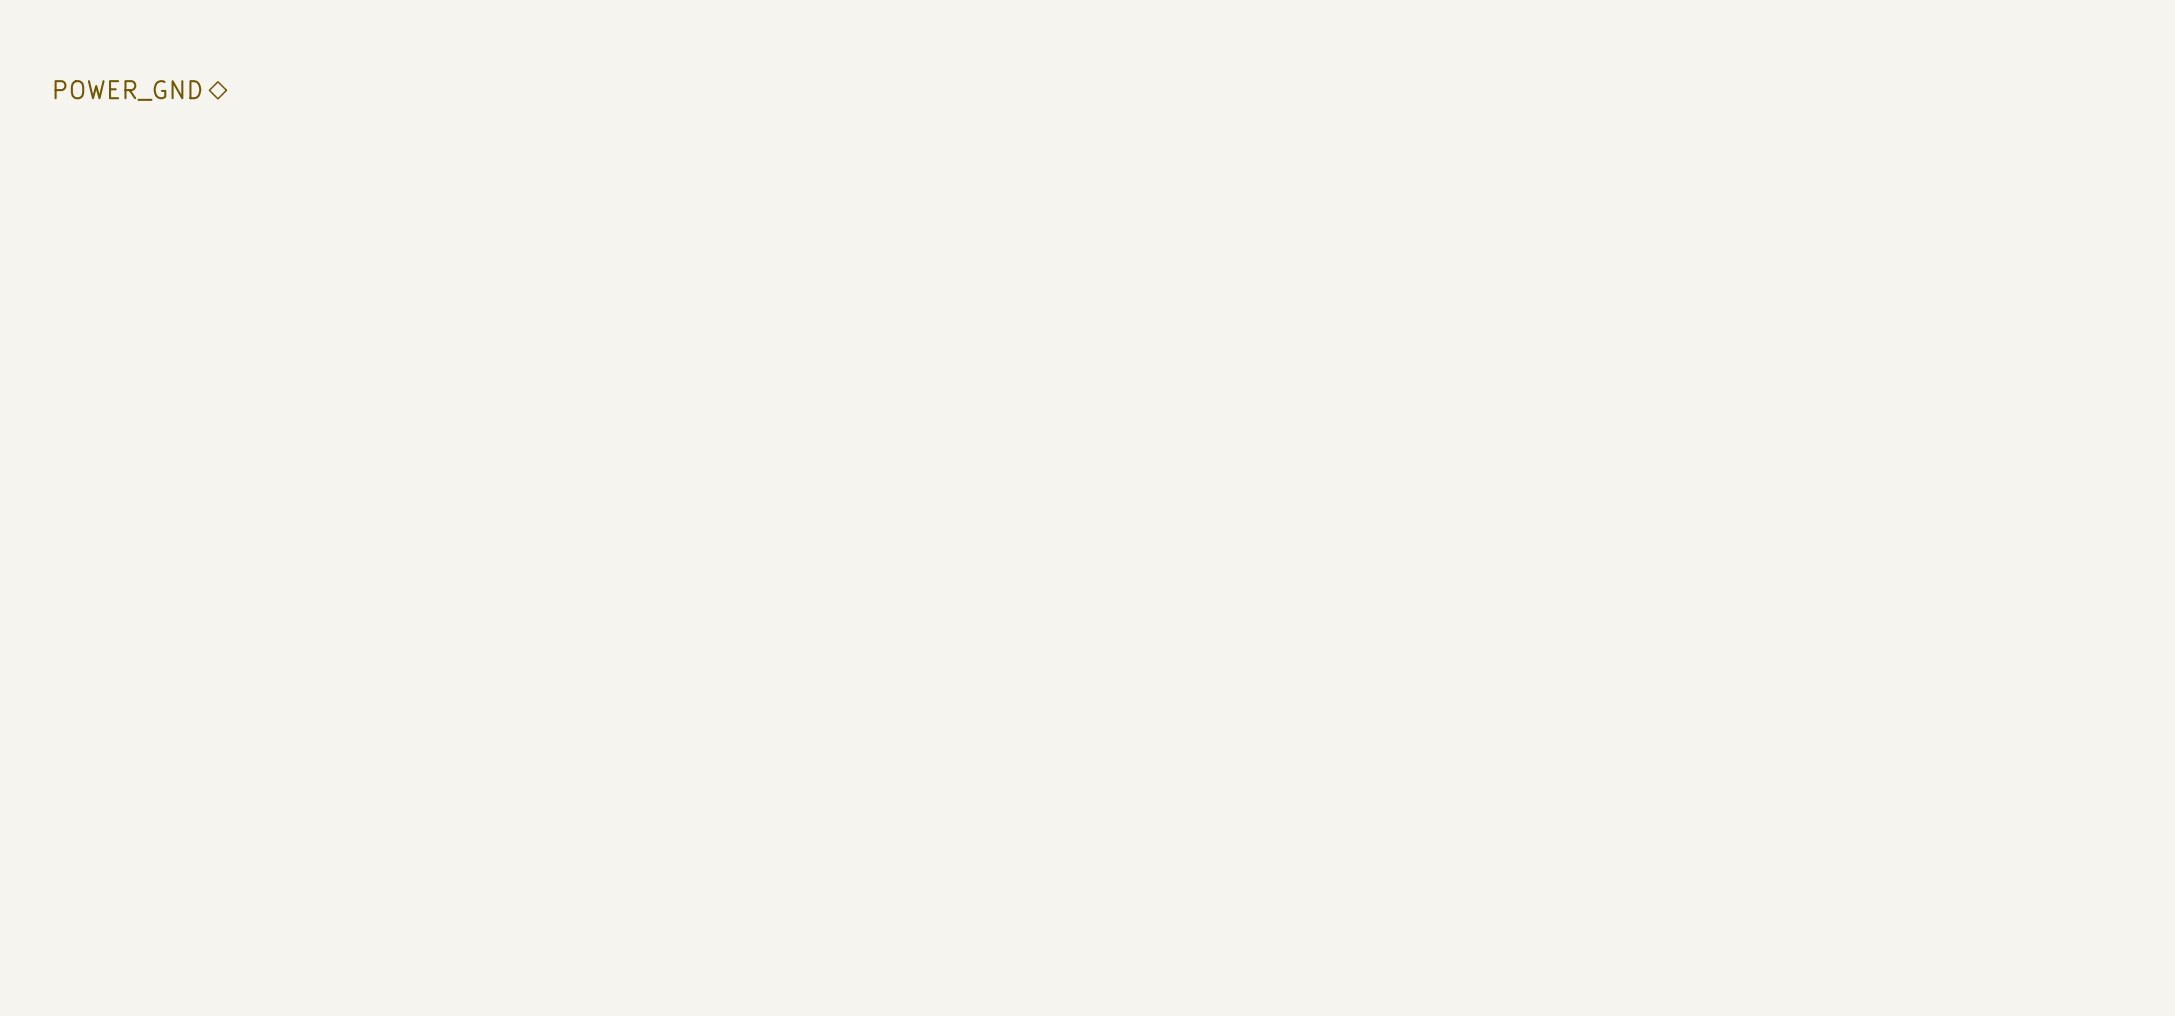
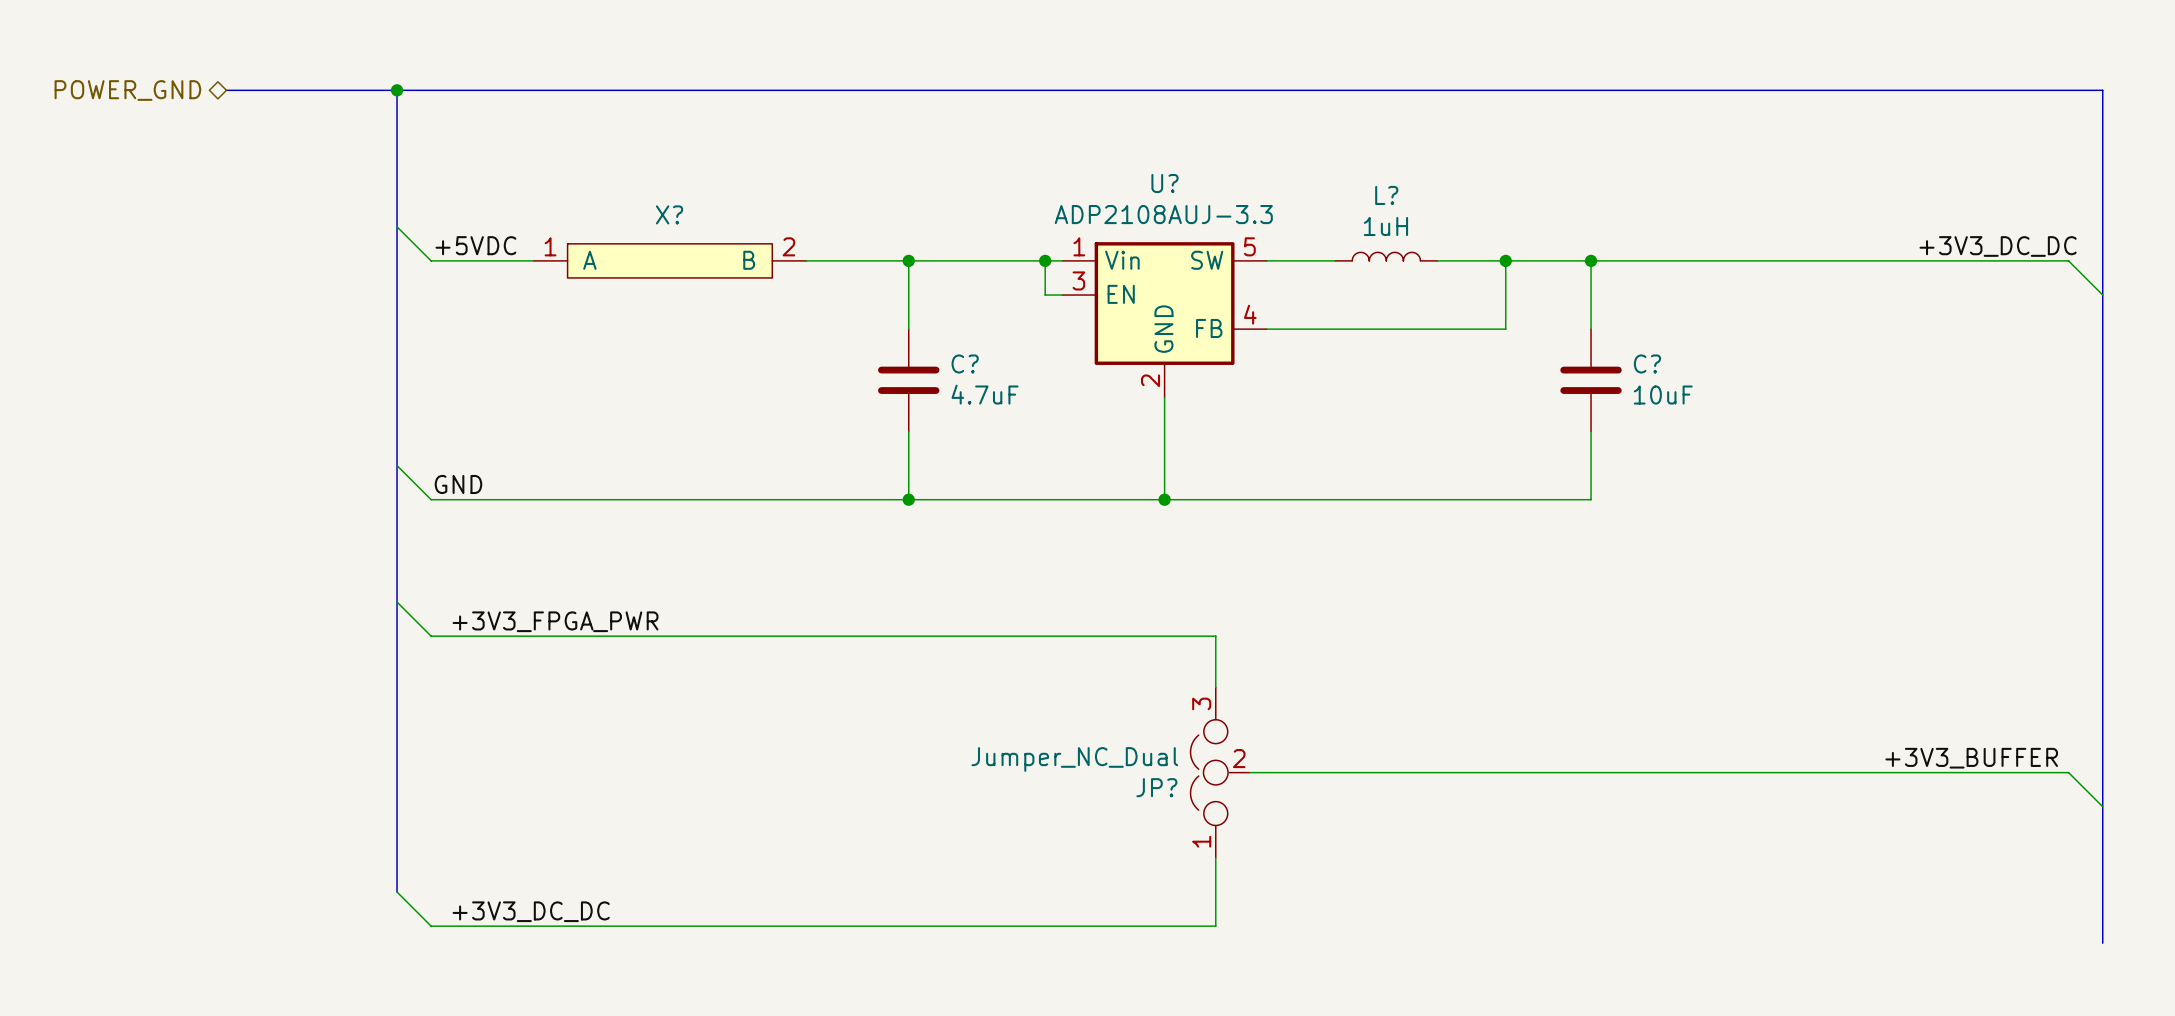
bus: none -> (226, 90) (2102, 90) (2102, 943)
bus: none -> (397, 90) (397, 892)
junction: none -> (397, 90)
wire: none -> (397, 226) (431, 260) (533, 260)
label: none -> +5VDC (475, 245)
label: none -> +3V3_DC_DC (1998, 246)
L?: none -> 1uH (1386, 256)
X?: none -> (669, 260)
wire: none -> (806, 260) (1062, 260)
wire: none -> (908, 260) (908, 329)
junction: none -> (908, 260)
wire: none -> (1045, 260) (1045, 295) (1062, 295)
junction: none -> (1045, 260)
wire: none -> (1266, 260) (1335, 260)
wire: none -> (1437, 260) (2068, 260) (2102, 295)
wire: none -> (1505, 260) (1505, 329) (1266, 329)
junction: none -> (1505, 260)
wire: none -> (1591, 260) (1591, 329)
junction: none -> (1591, 260)
U?: none -> ADP2108AUJ-3.3 (1164, 319)
C?: none -> 4.7uF (908, 380)
C?: none -> 10uF (1591, 380)
wire: none -> (1164, 397) (1164, 499)
wire: none -> (908, 431) (908, 499)
wire: none -> (1591, 431) (1591, 499) (431, 499) (397, 465)
label: none -> GND (458, 484)
junction: none -> (908, 499)
junction: none -> (1164, 499)
wire: none -> (397, 602) (431, 636) (1215, 636) (1215, 687)
label: none -> +3V3_FPGA_PWR (555, 621)
label: none -> +3V3_BUFFER (1971, 758)
JP?: none -> Jumper_NC_Dual (1220, 772)
wire: none -> (1249, 772) (2068, 772) (2102, 806)
wire: none -> (1215, 857) (1215, 926) (431, 926) (397, 892)
label: none -> +3V3_DC_DC (531, 911)

